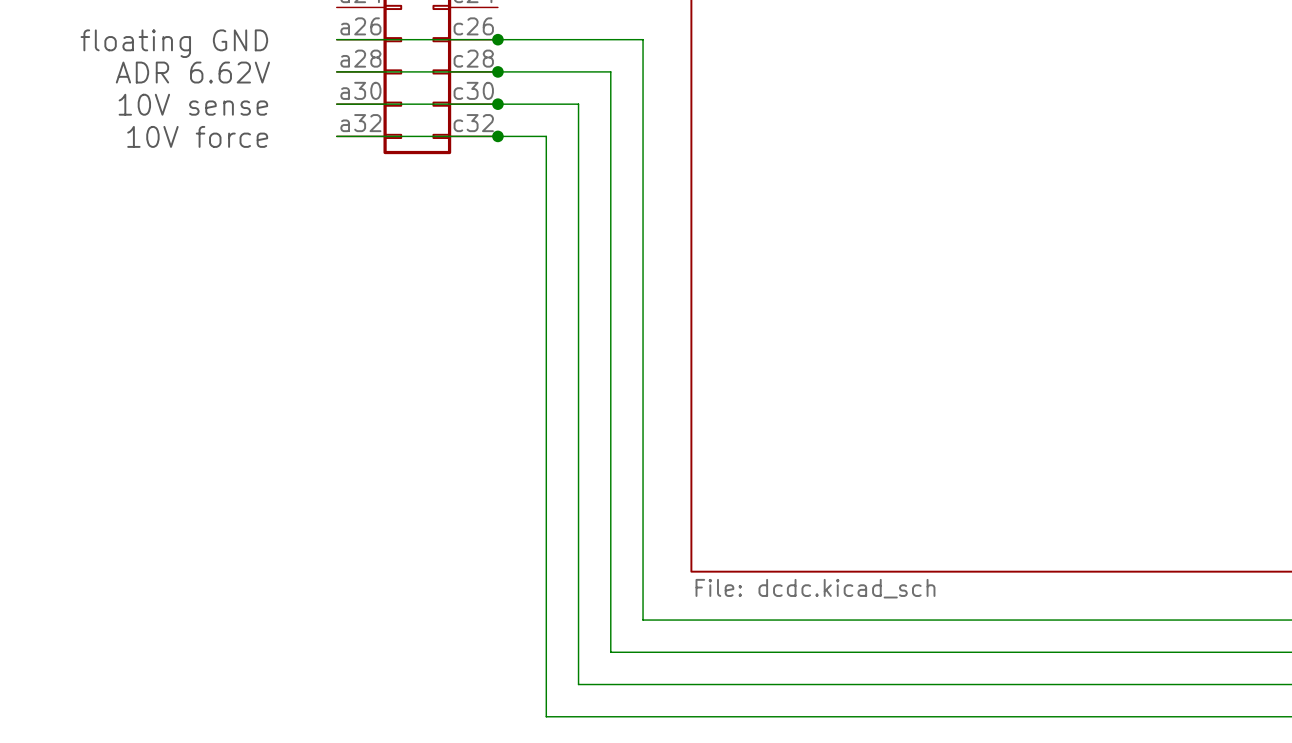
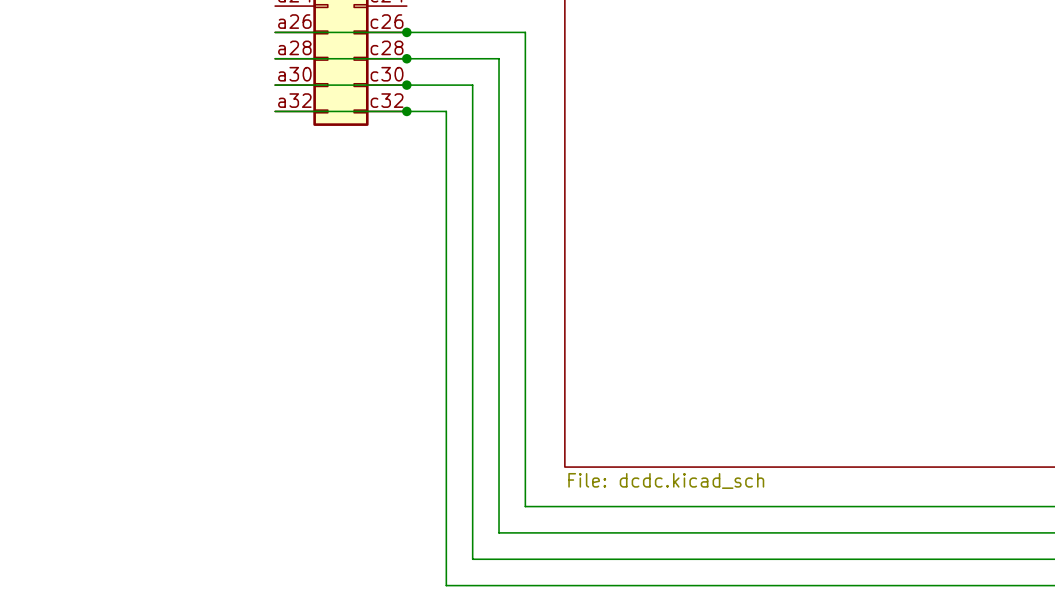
text: floating GND (174, 43) -> none
text: ADR 6.62V (192, 72) -> none
text: 10V sense (193, 104) -> none
text: 10V force (197, 136) -> none

